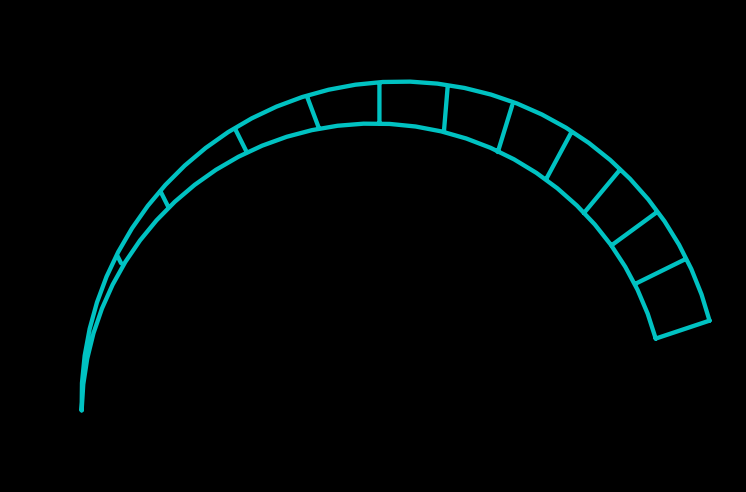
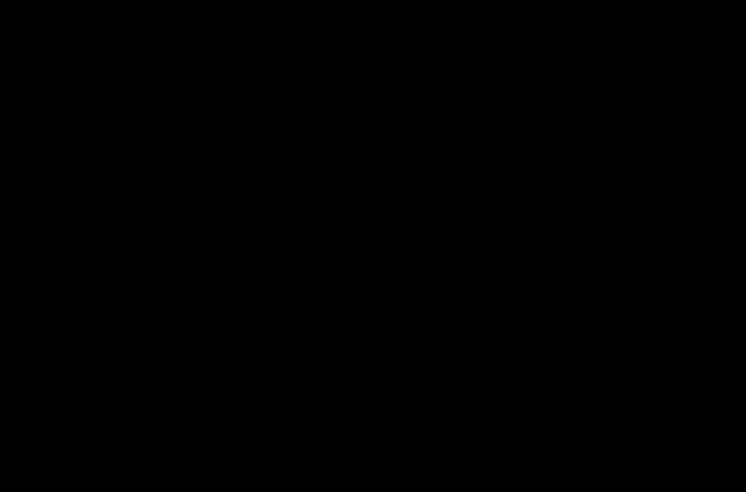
line: (379, 83) (379, 123) -> none
line: (447, 87) (444, 130) -> none
line: (307, 98) (318, 126) -> none
line: (512, 105) (497, 152) -> none
line: (235, 130) (246, 152) -> none
line: (571, 132) (546, 178) -> none
line: (619, 169) (583, 213) -> none
line: (160, 191) (167, 205) -> none
line: (655, 213) (611, 245) -> none
line: (117, 256) (121, 263) -> none
line: (684, 259) (635, 283) -> none
line: (709, 320) (655, 338) (637, 289) (625, 266) (594, 224) (557, 188) (514, 159) (466, 138) (441, 131) (389, 123) (337, 125) (286, 136) (238, 156) (194, 184) (156, 220) (125, 262) (101, 308) (87, 358) (81, 410) (84, 355) (96, 302) (118, 251) (147, 205) (184, 165) (228, 132) (251, 118) (302, 97) (355, 84) (410, 81) (464, 87) (516, 103) (565, 127) (610, 159) (630, 178) (664, 221) (691, 269) (709, 320) -> none

